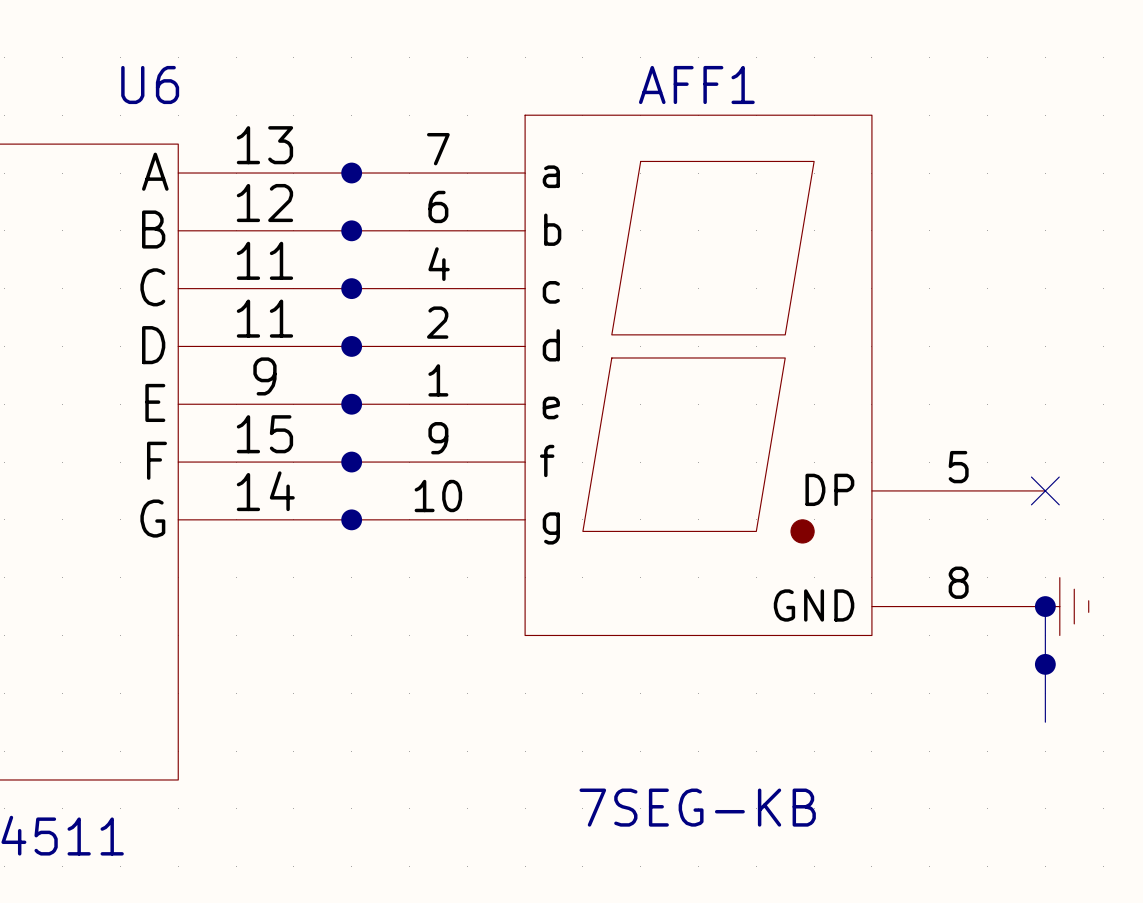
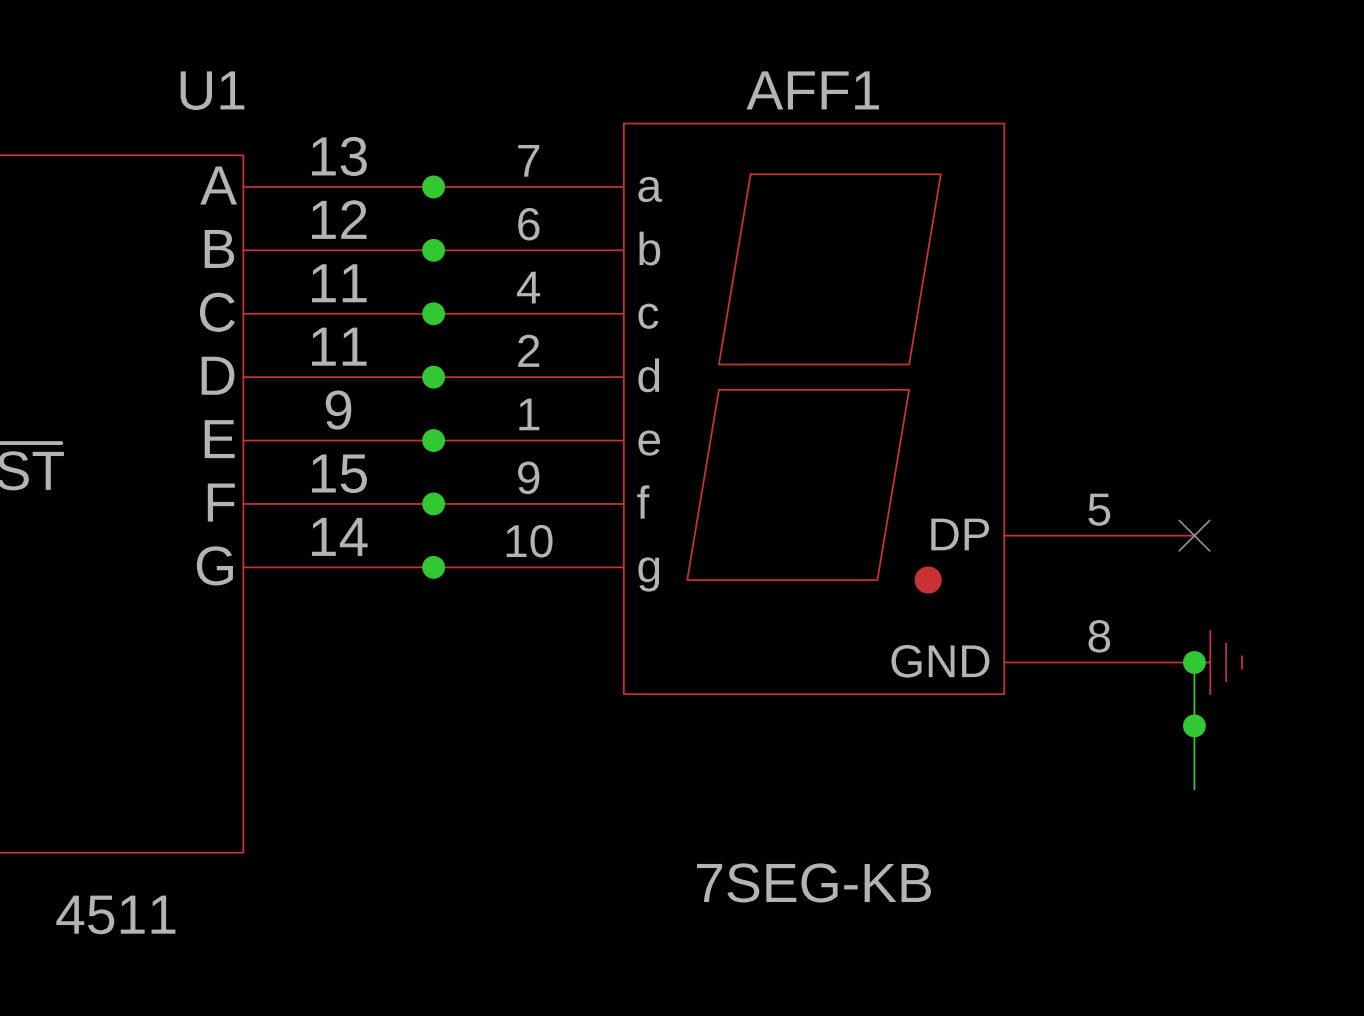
U6 name: U6 (150, 85) -> U1 (212, 90)

